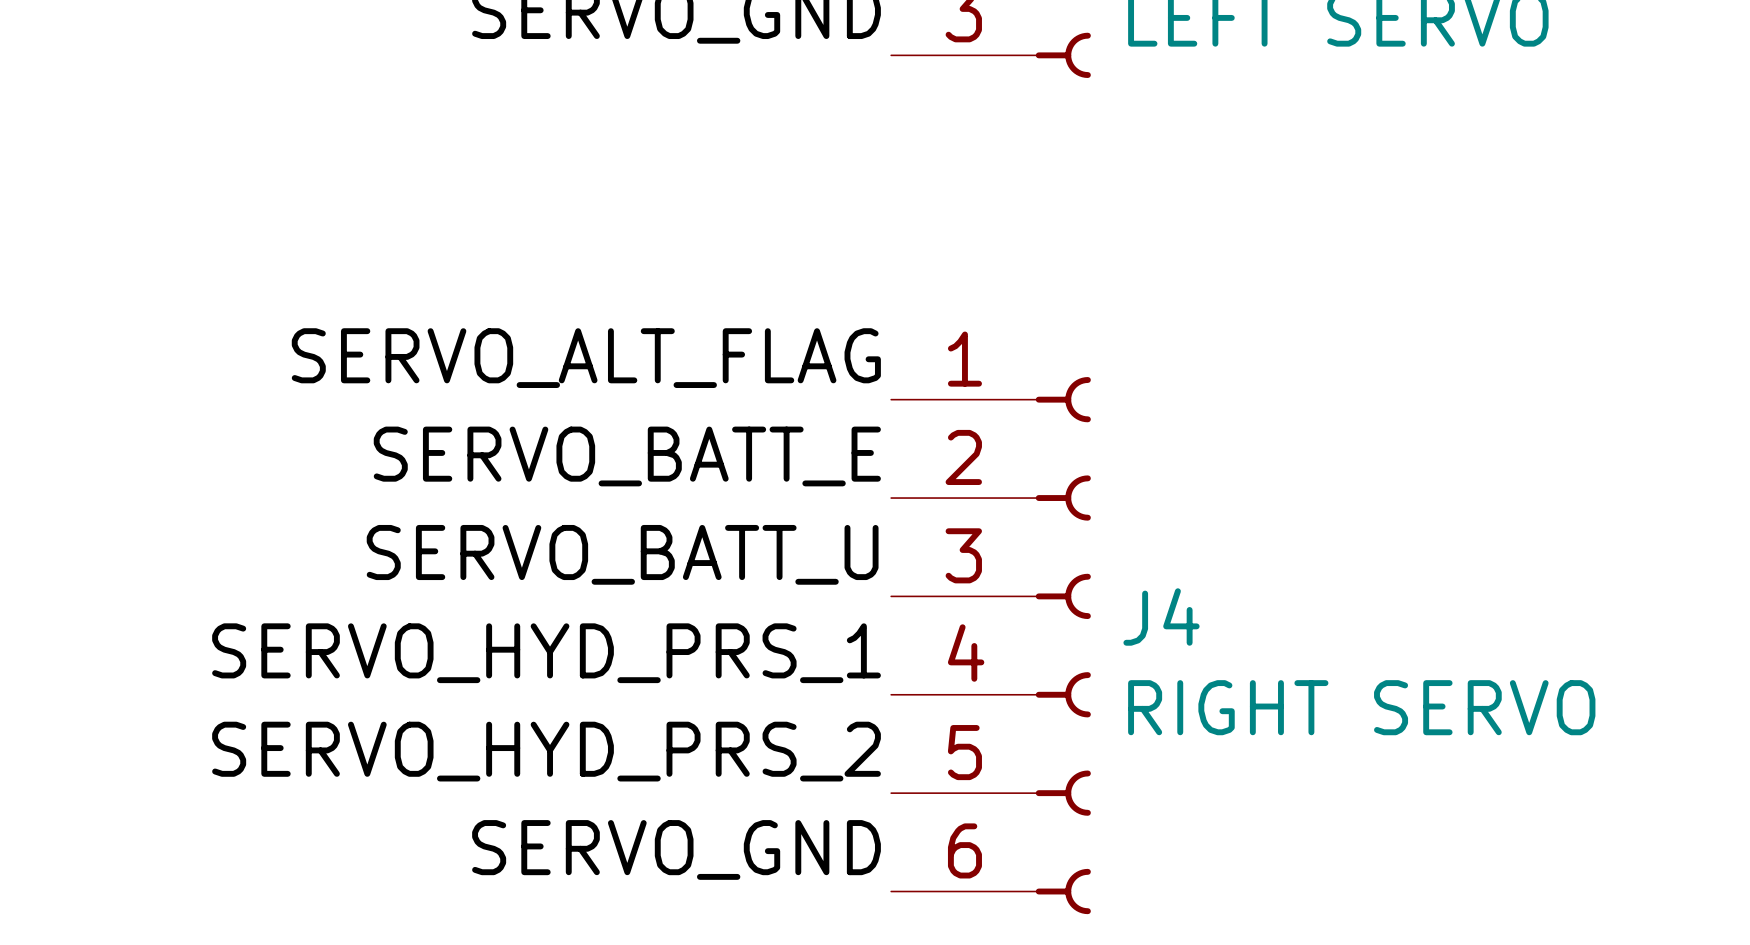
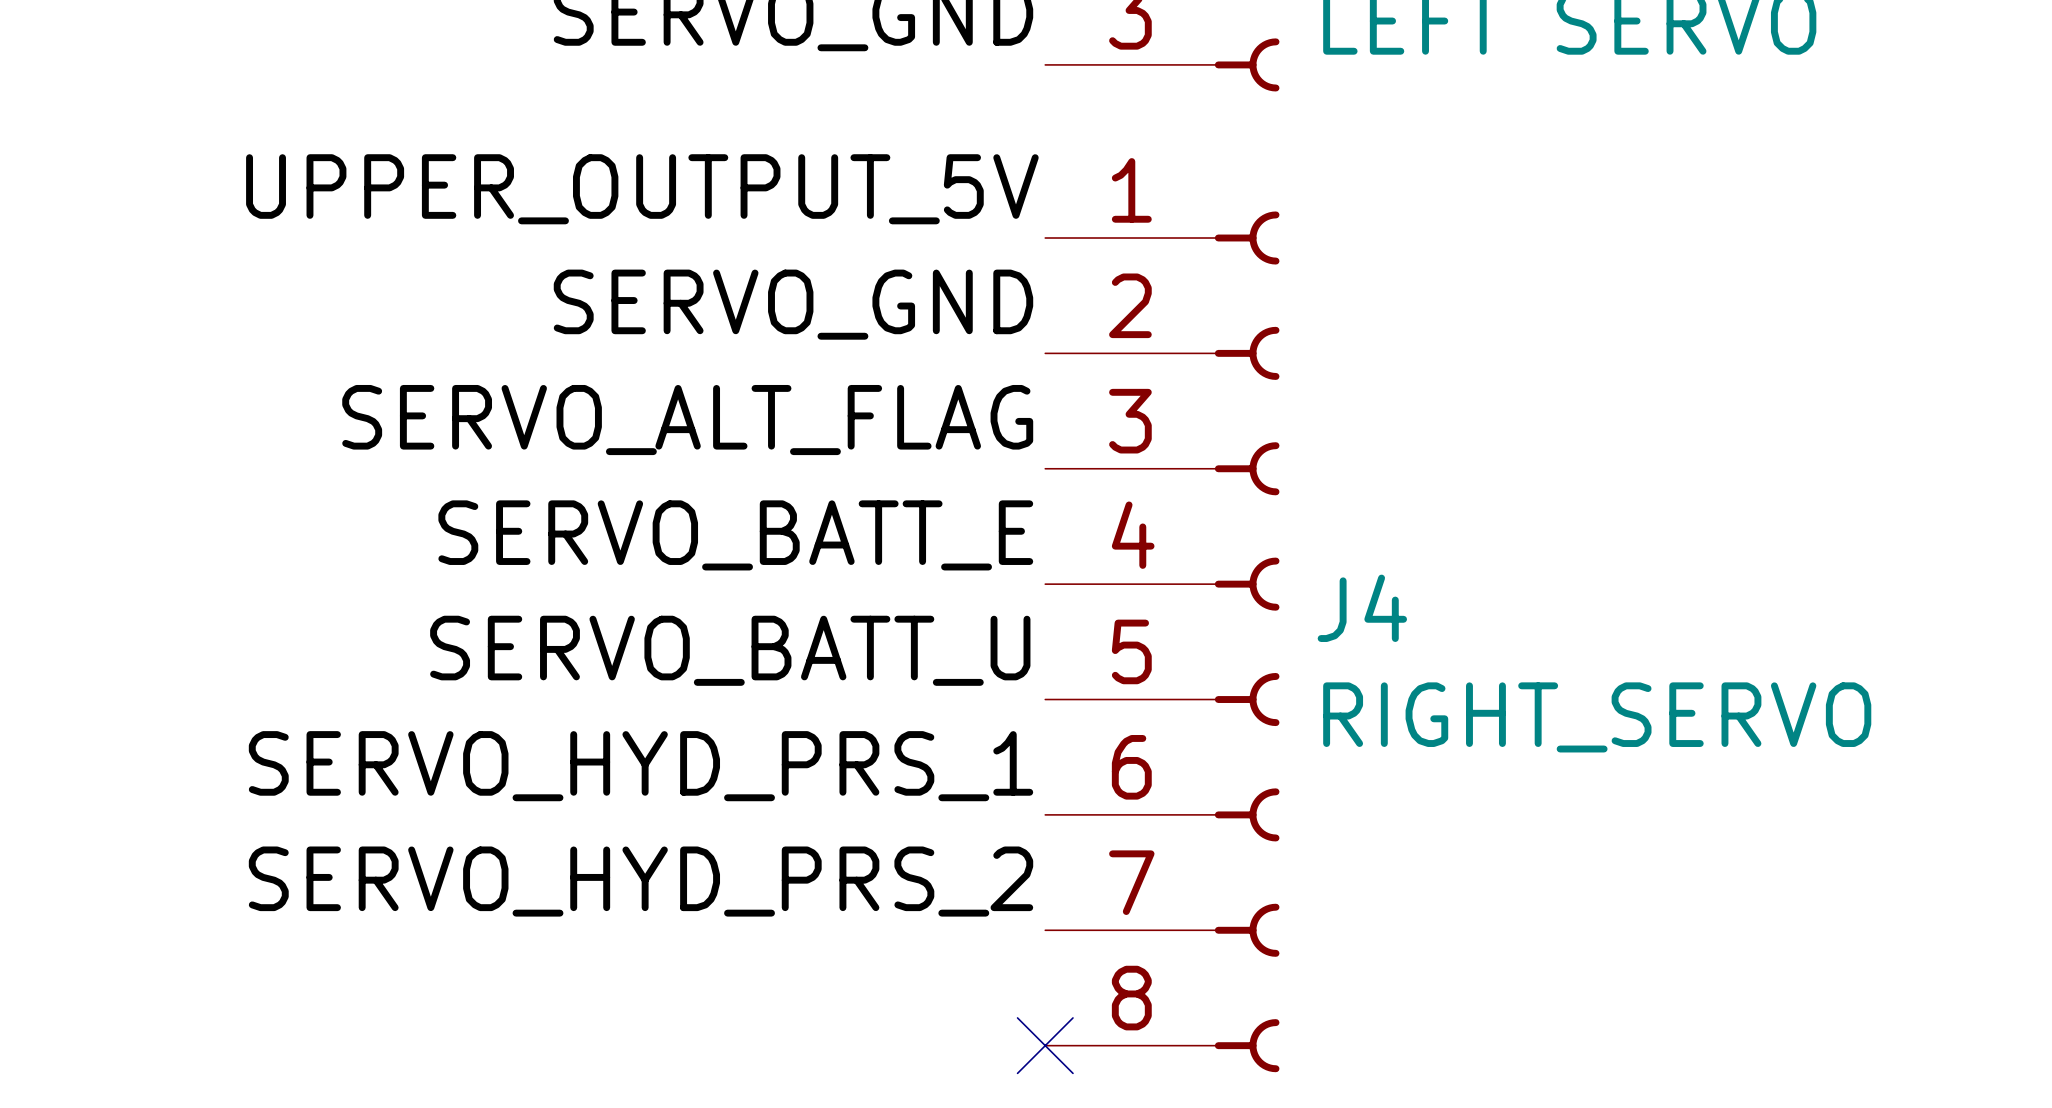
label: none -> UPPER_OUTPUT_5V (642, 189)
J4 symbol: [891, 377, 1091, 915] -> [1045, 211, 1280, 1073]
J4 value: RIGHT SERVO (1361, 707) -> RIGHT_SERVO (1597, 717)
label position: SERVO_GND (676, 849) -> SERVO_GND (793, 304)
no-connect mark: none -> (1045, 1045)

